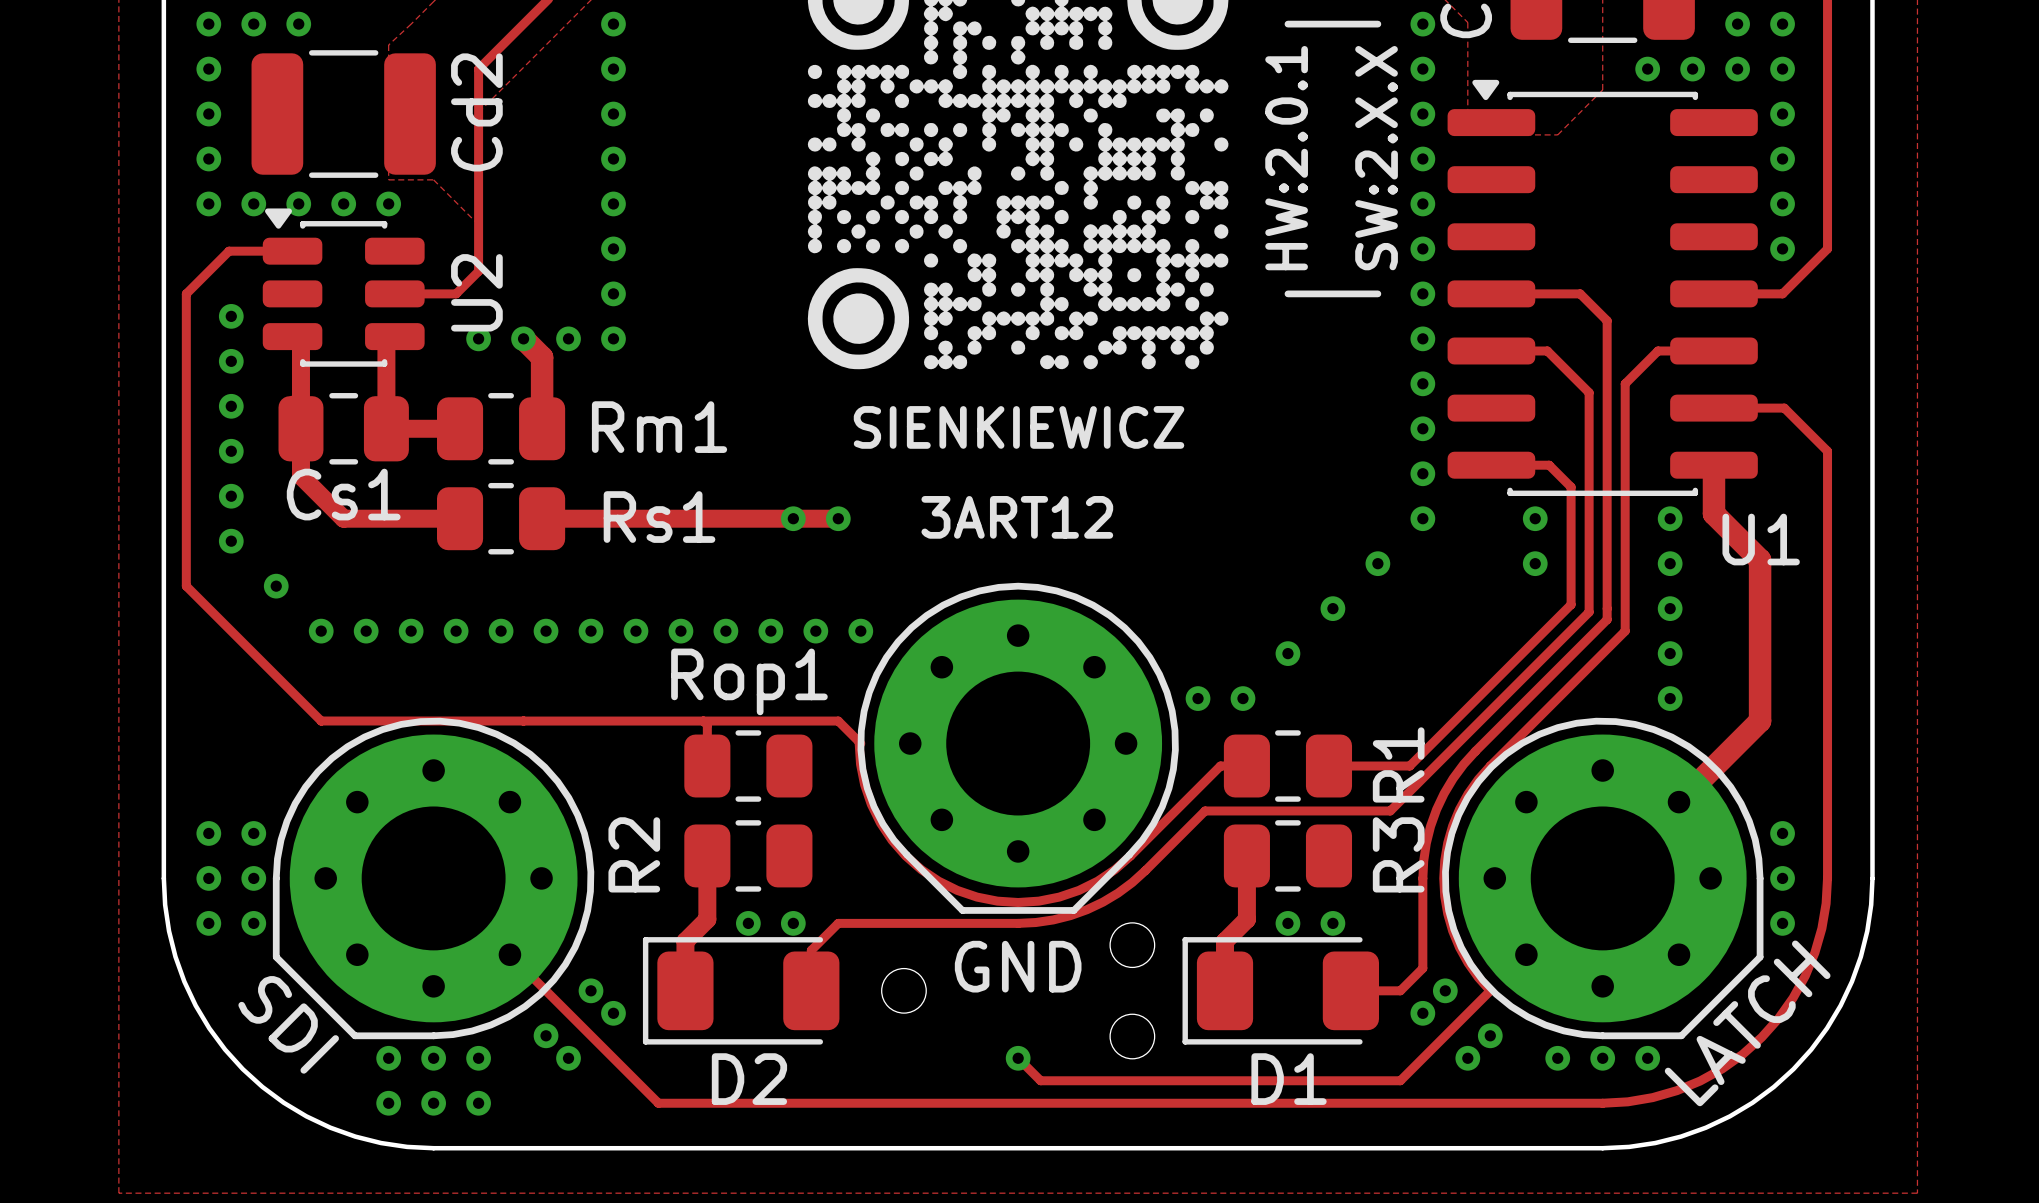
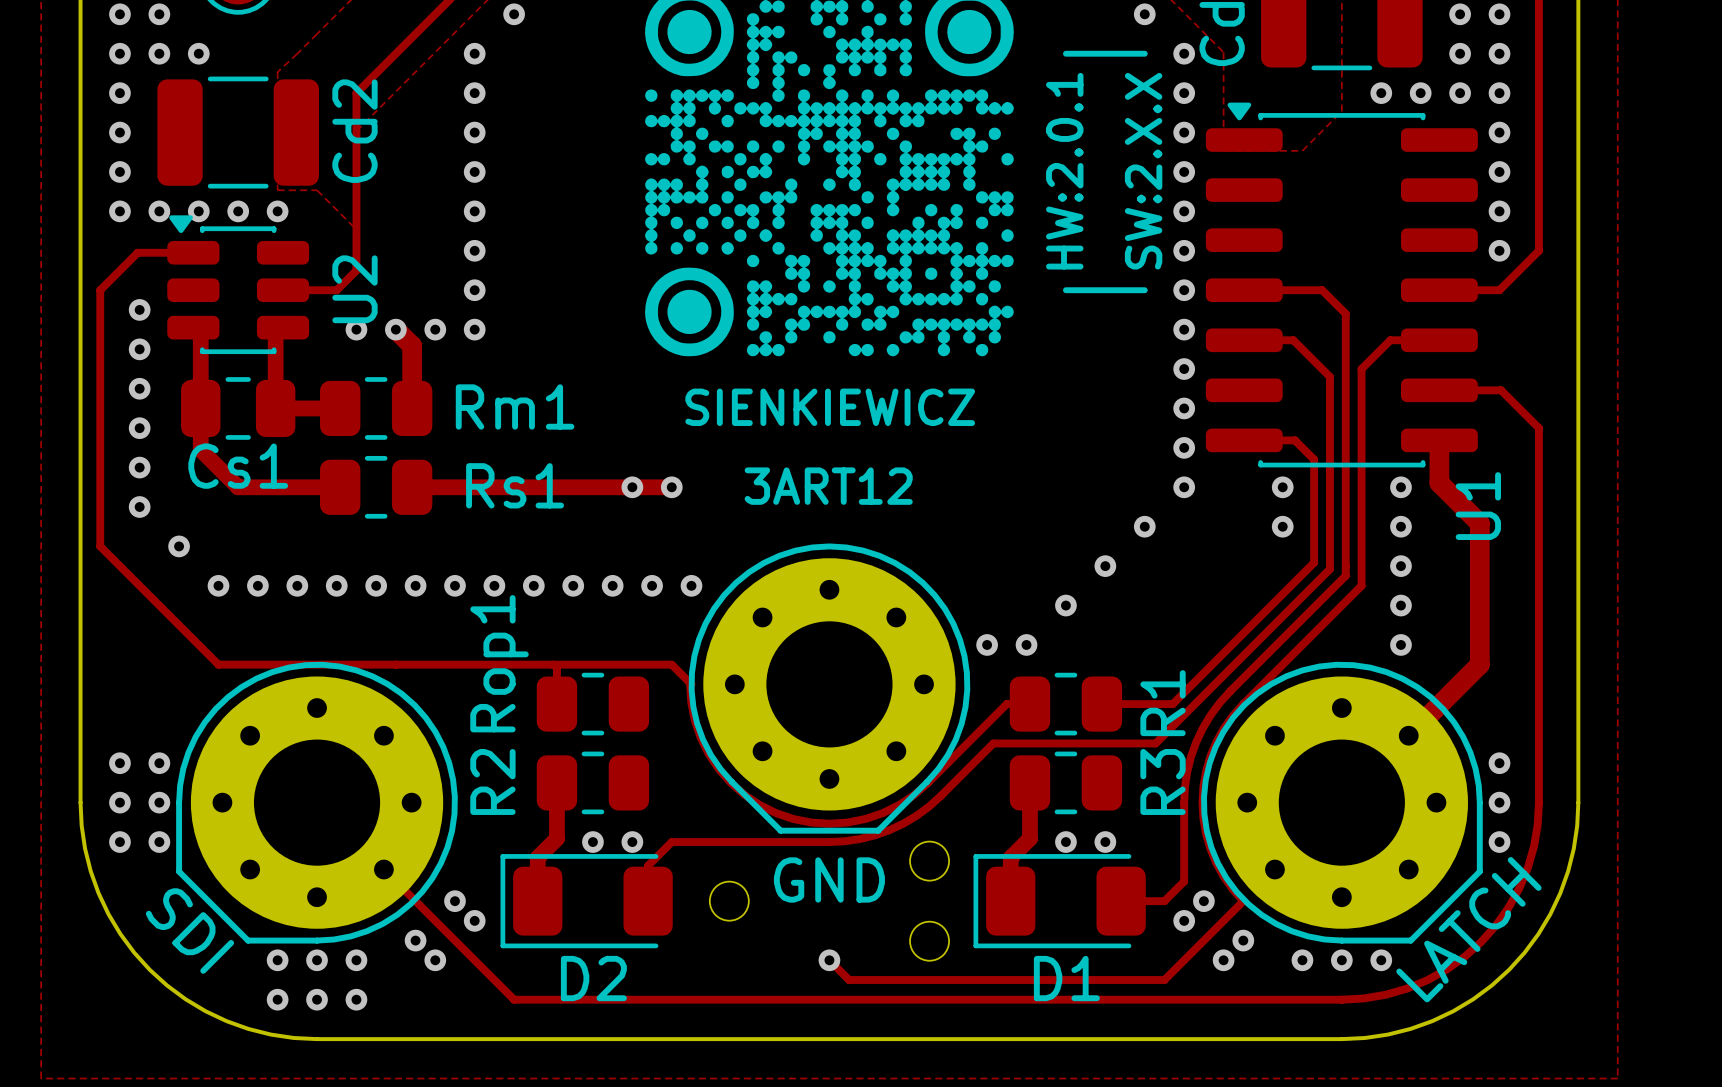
U1 name rotation: 0° (1761, 539) -> 90° counterclockwise (1478, 506)
Rop1 name rotation: 0° (749, 681) -> 90° counterclockwise (499, 663)

